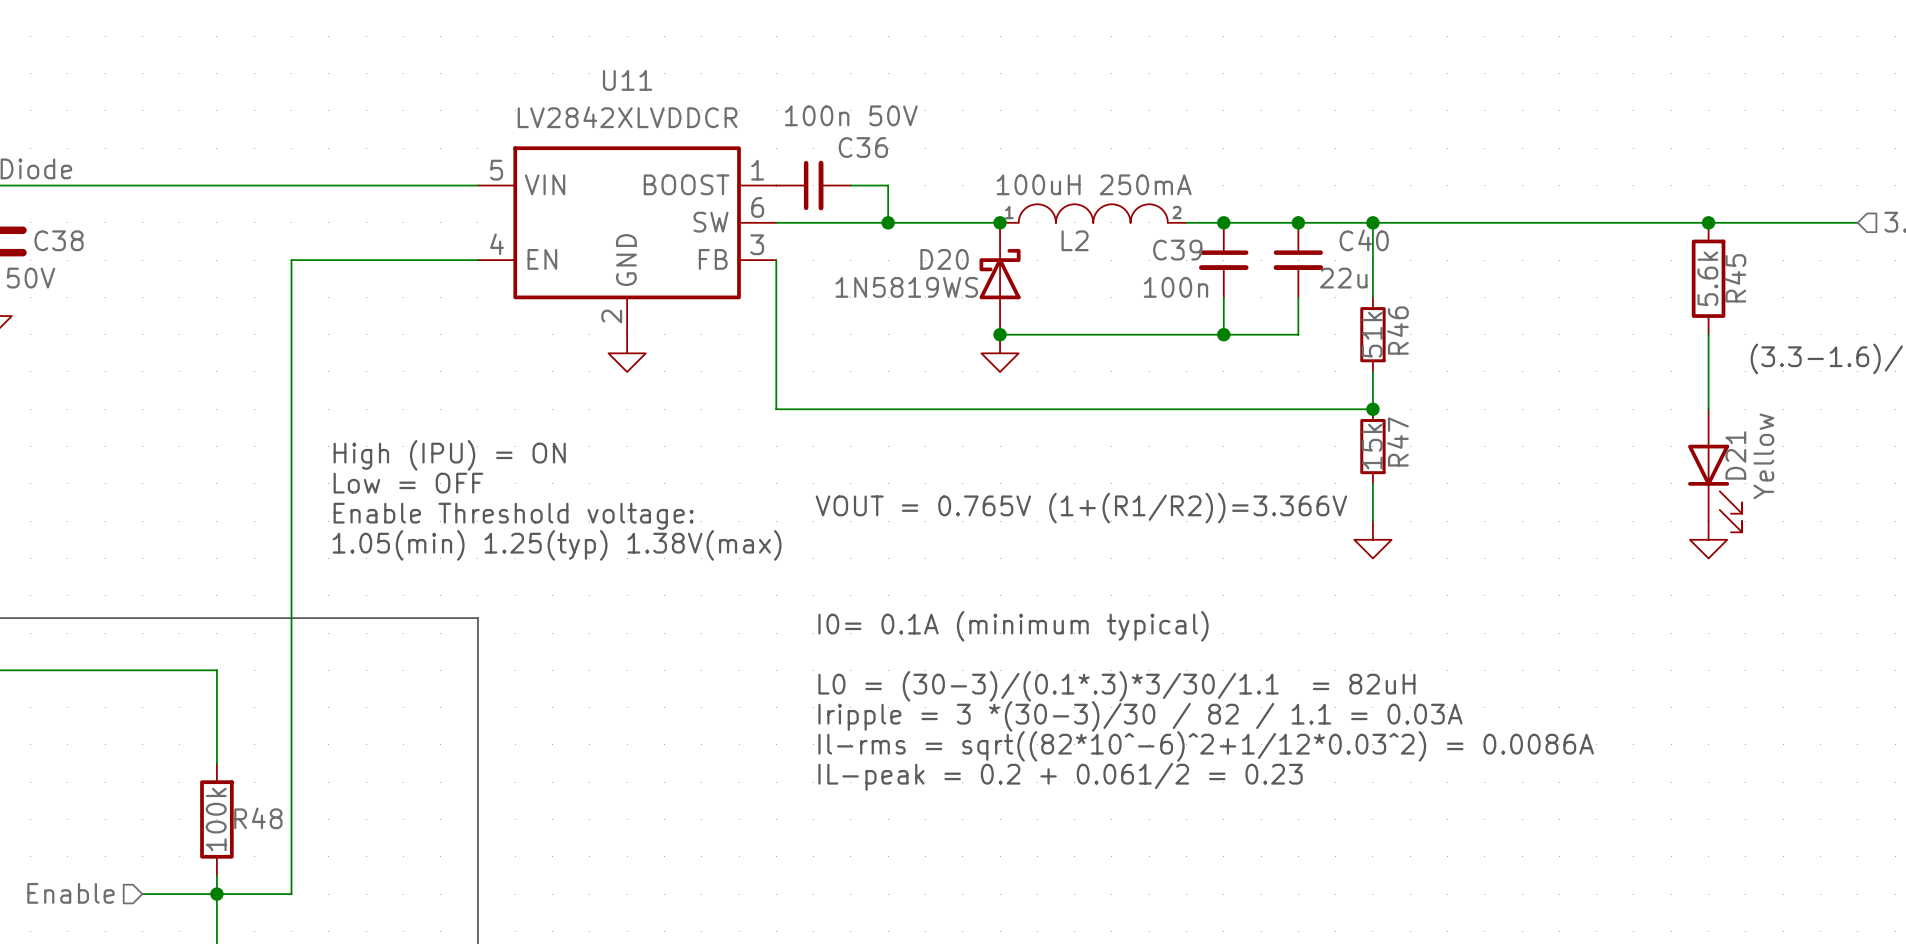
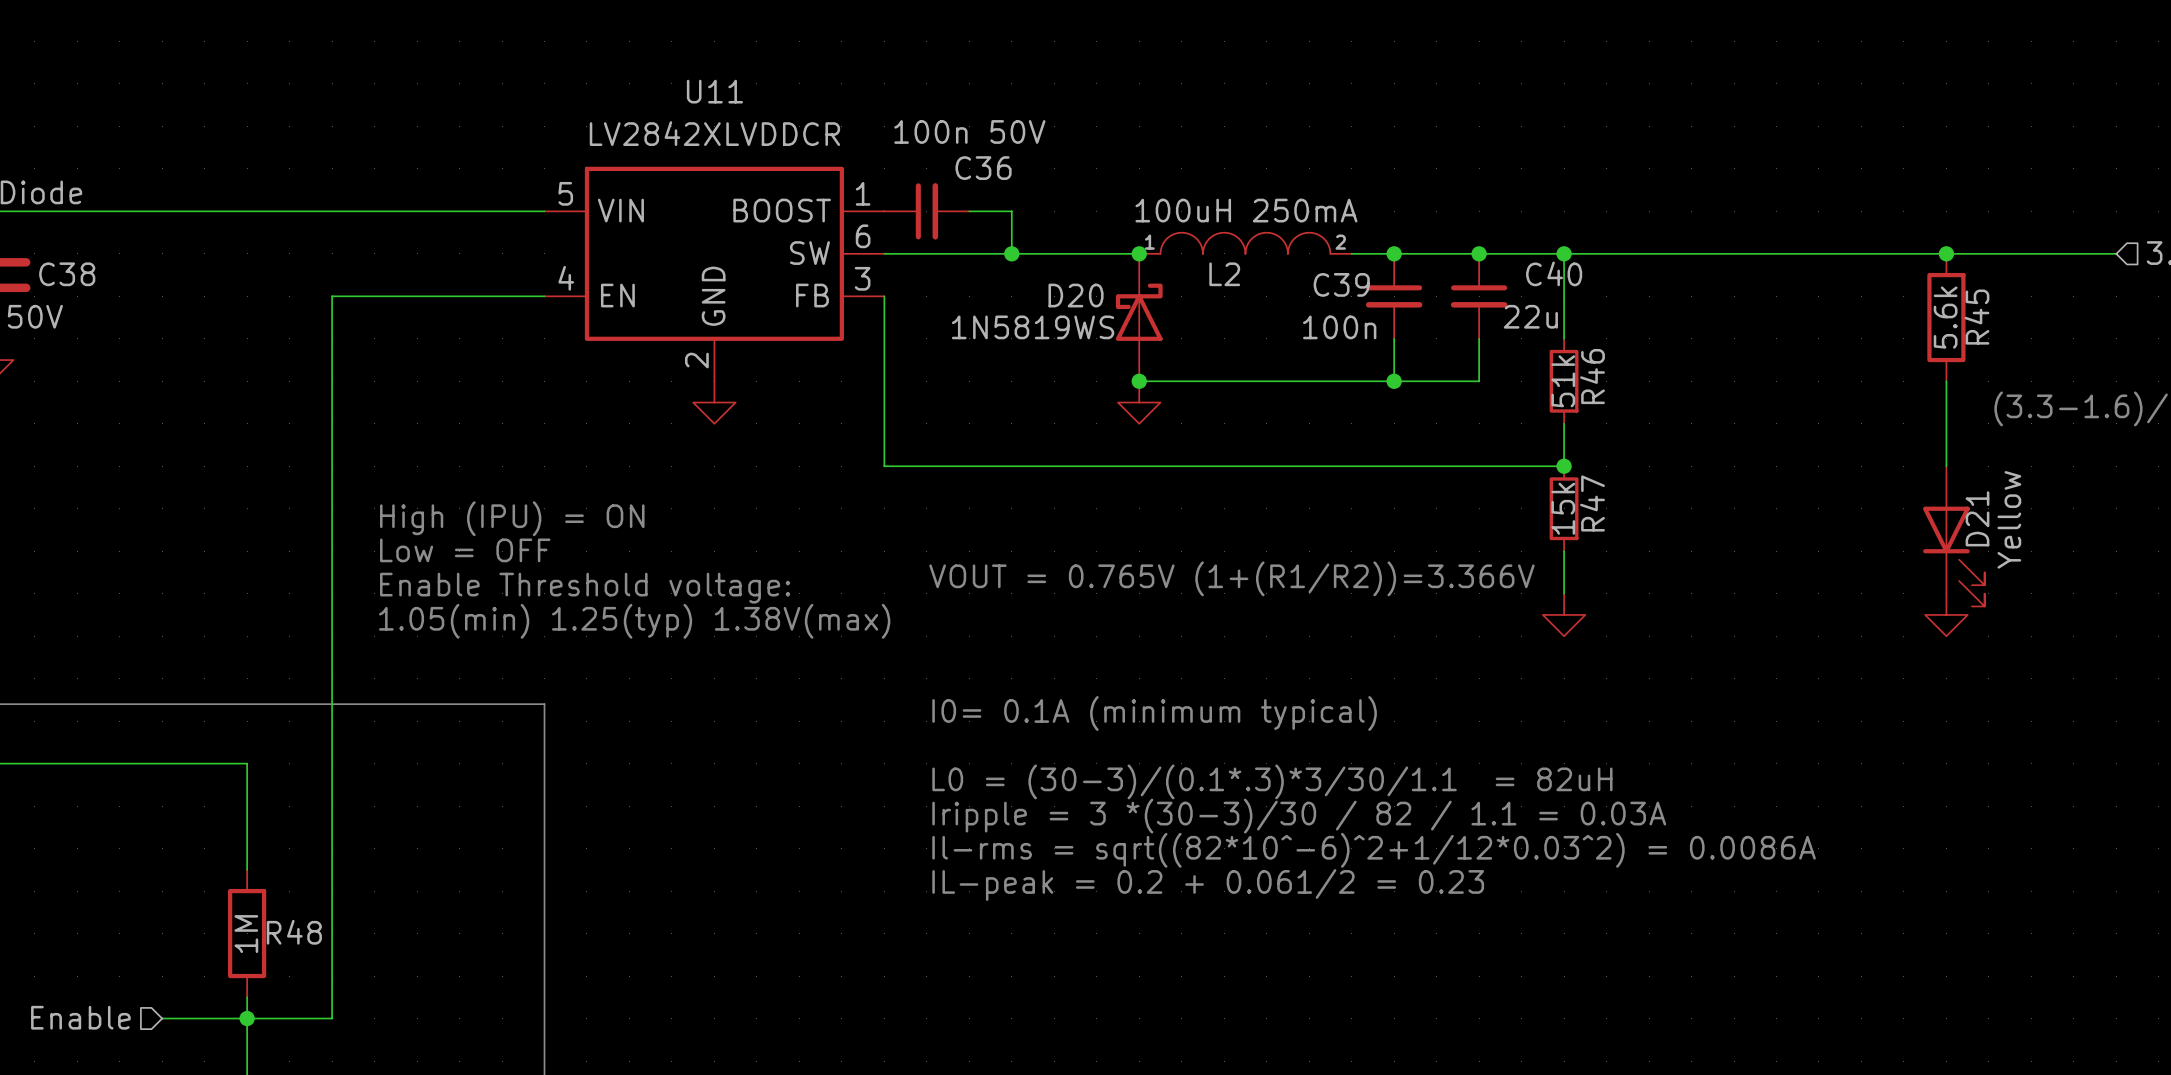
R48 value: 100k (216, 819) -> 1M (246, 934)

